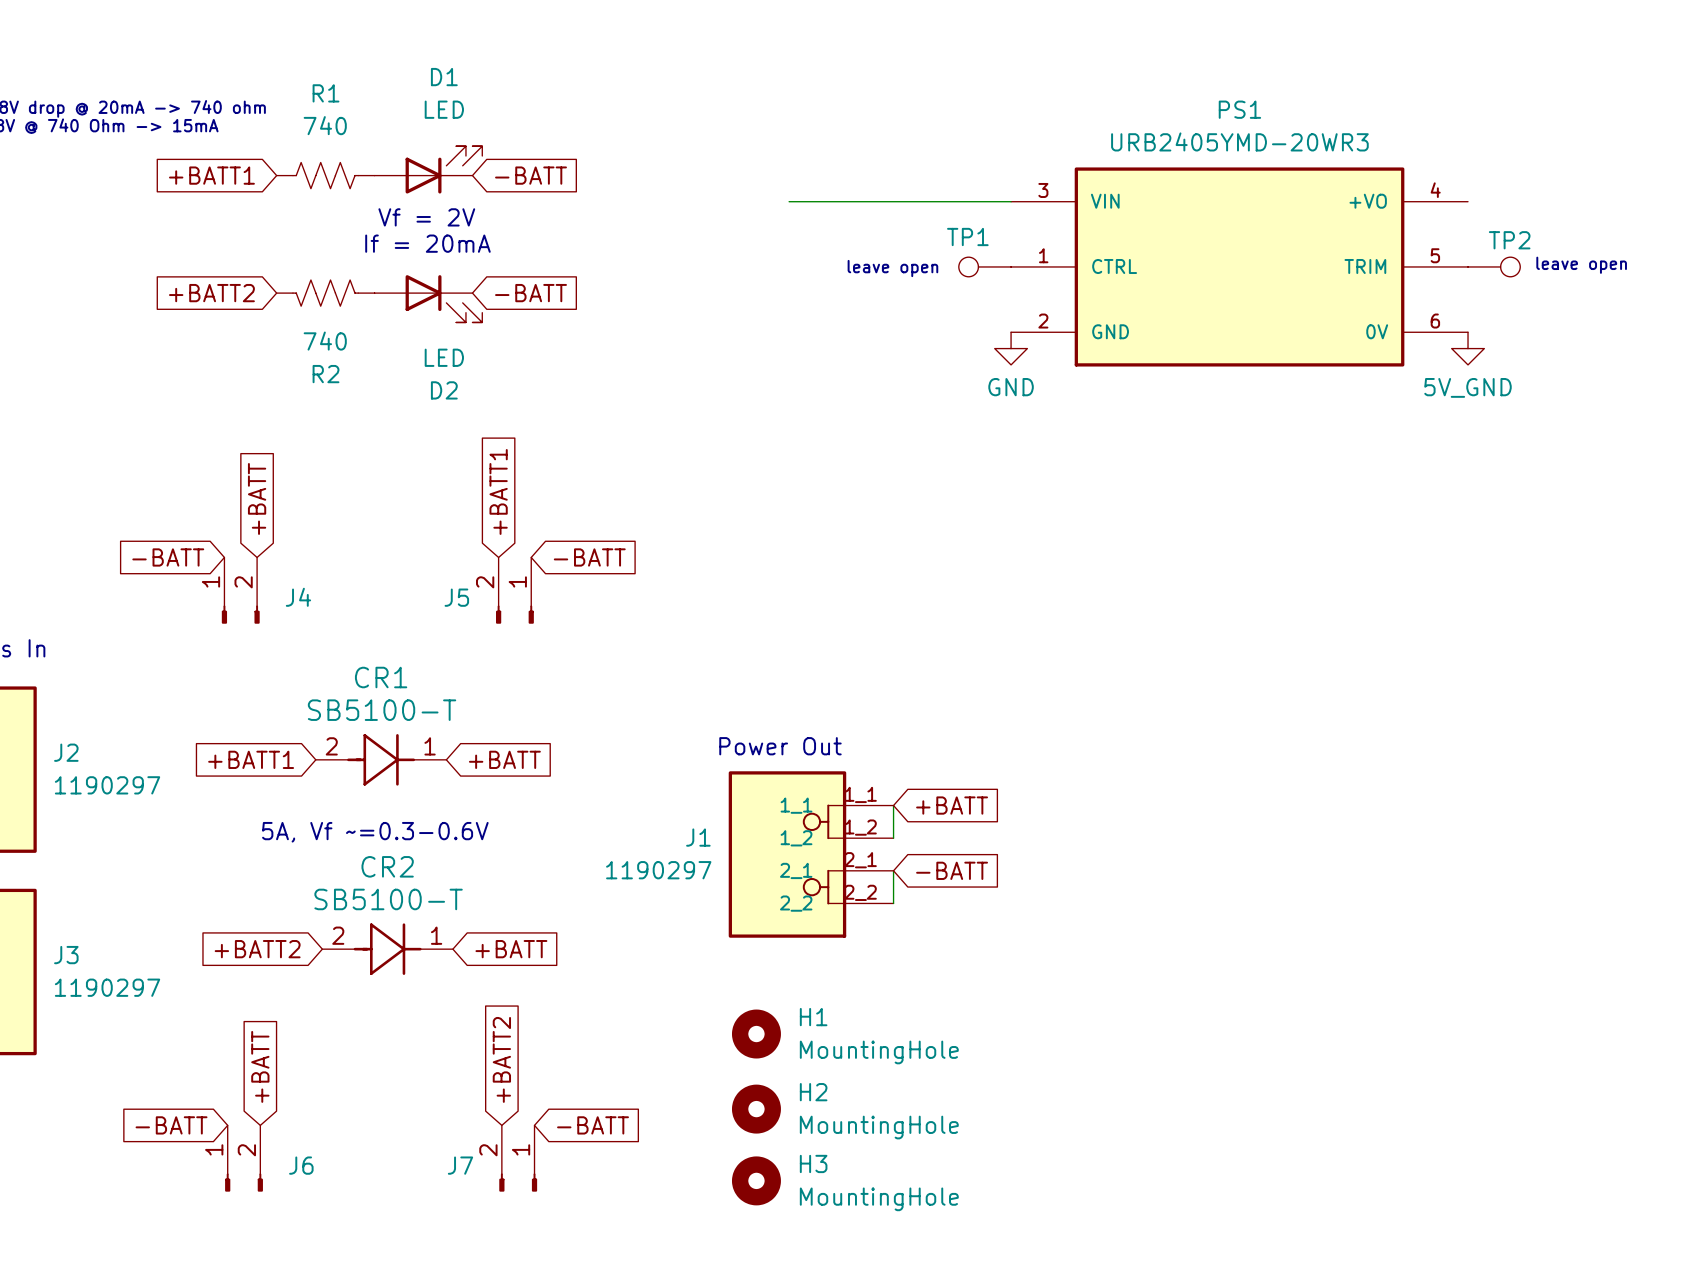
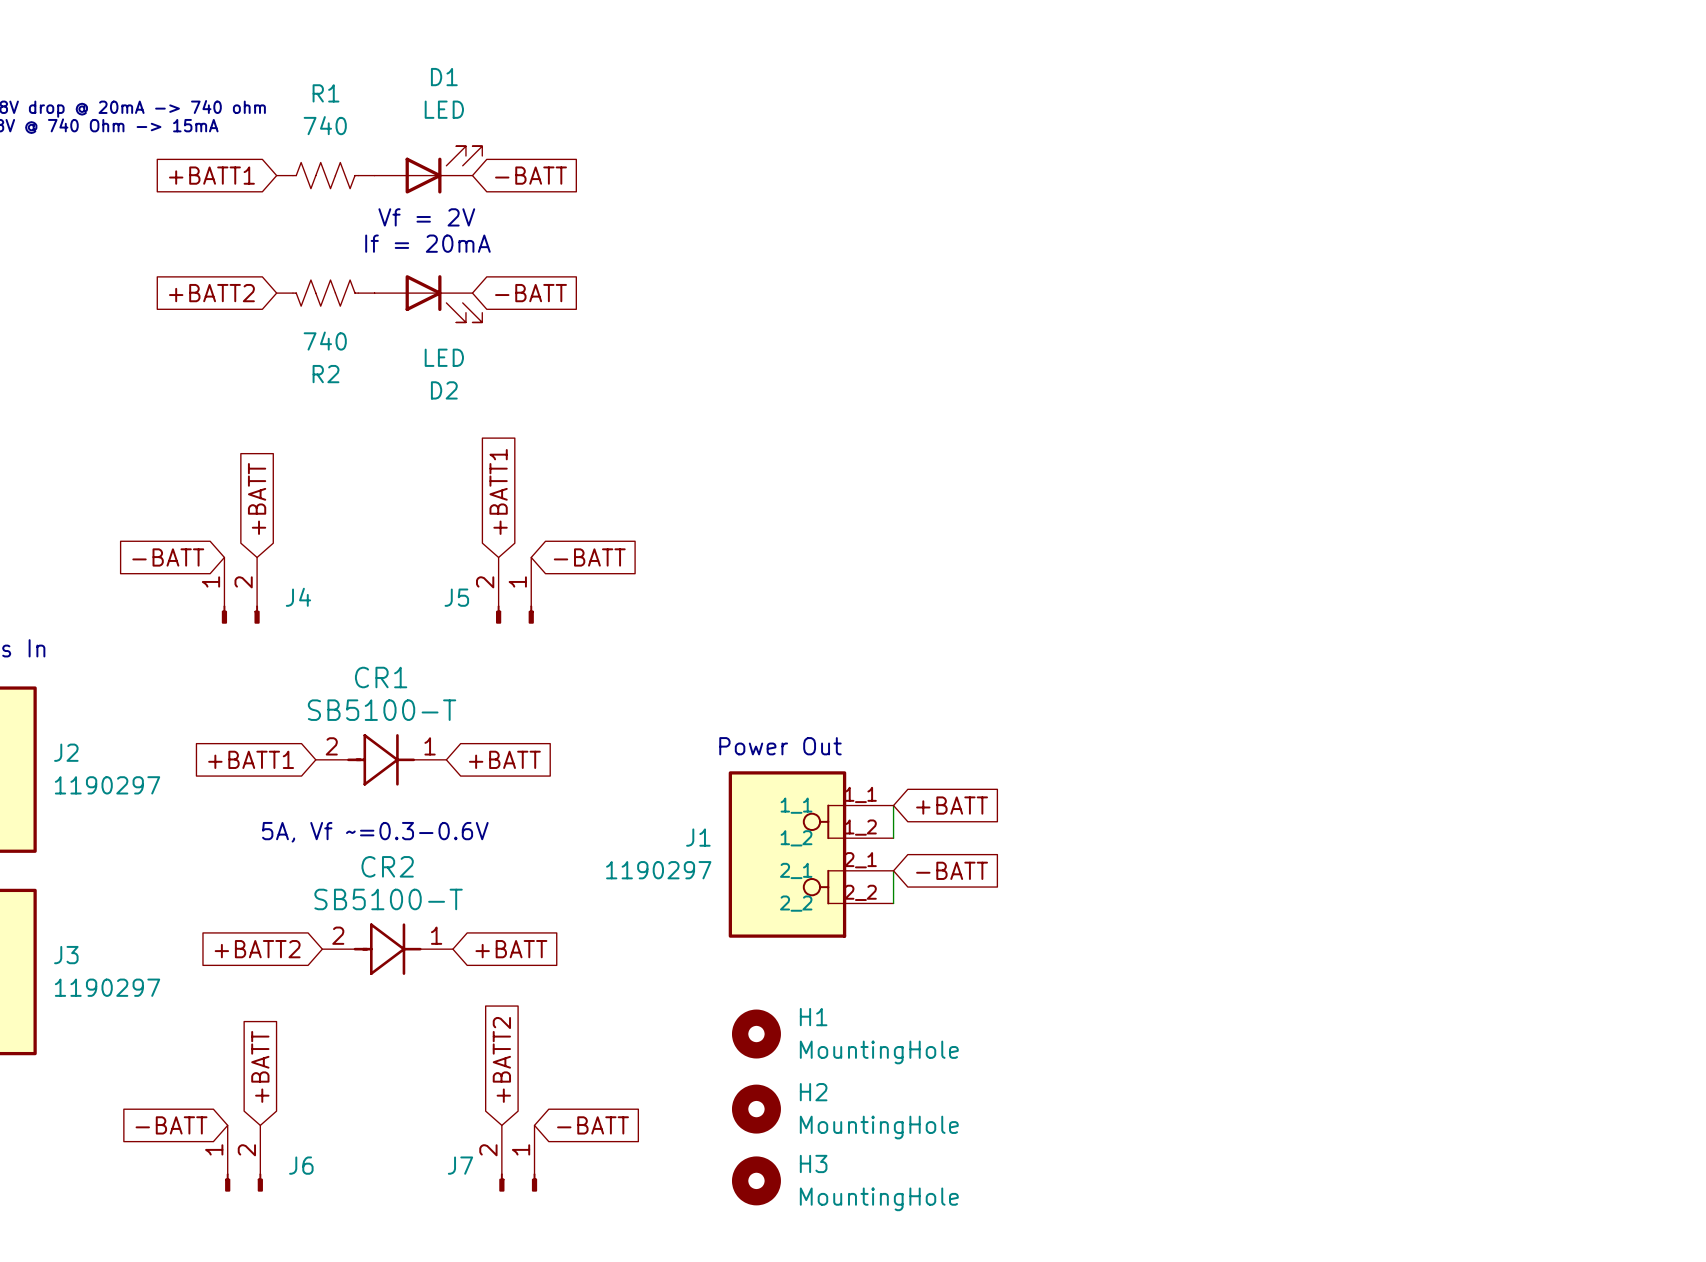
wire: (789, 201) (1011, 201) -> none
text: leave open (1581, 265) -> none
TP1: (984, 266) -> none
PS1: URB2405YMD-20WR3 (1239, 266) -> none
TP2: (1494, 266) -> none
text: leave open (892, 268) -> none
power symbol: GND (1011, 348) -> none
power symbol: 5V_GND (1468, 348) -> none

